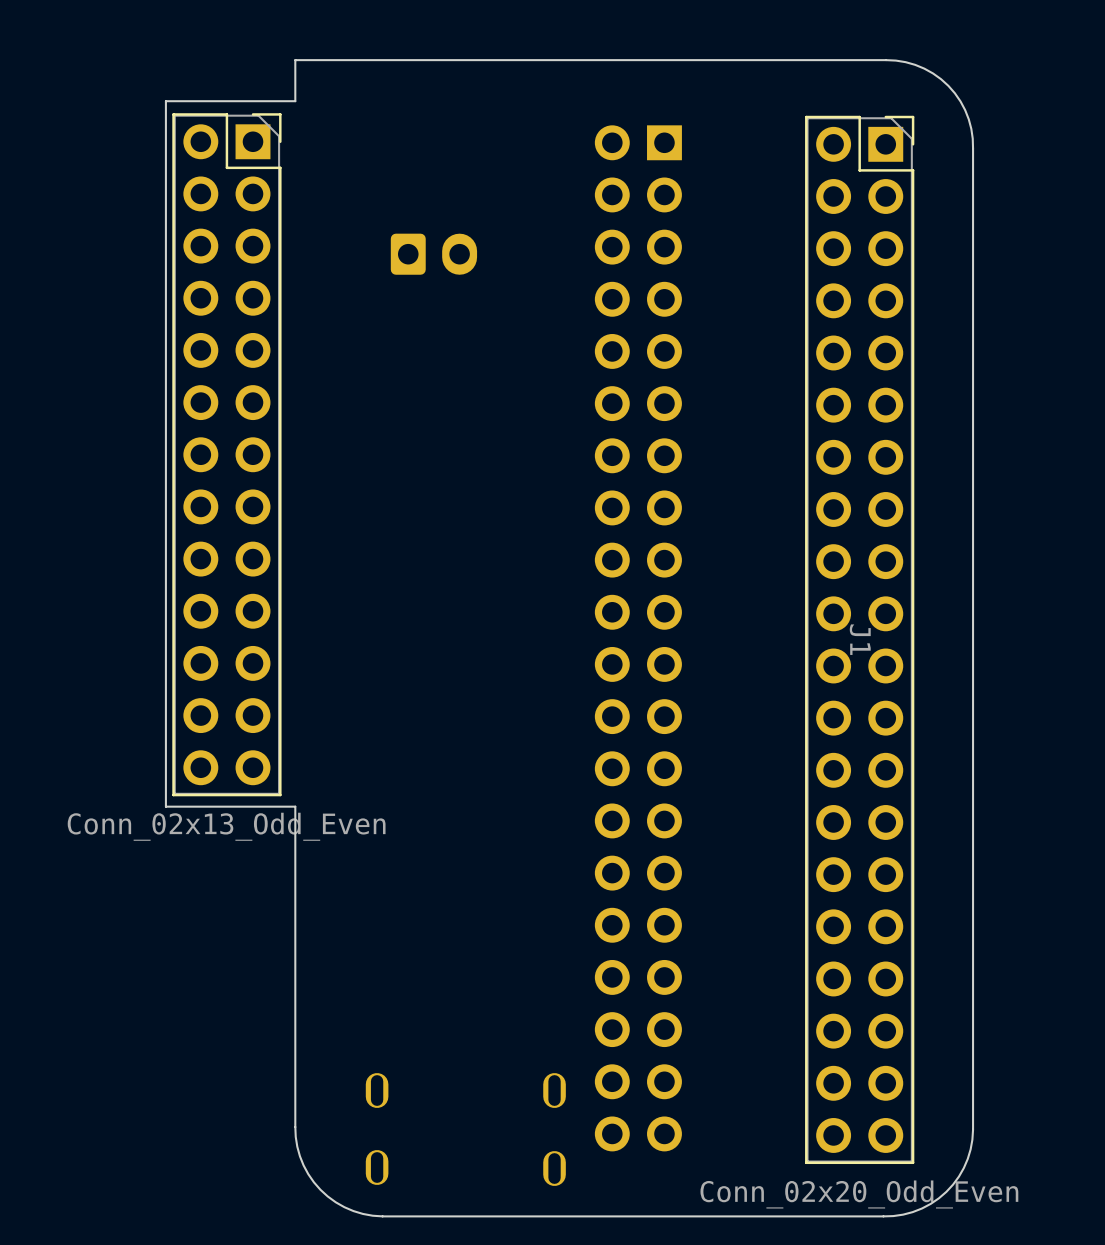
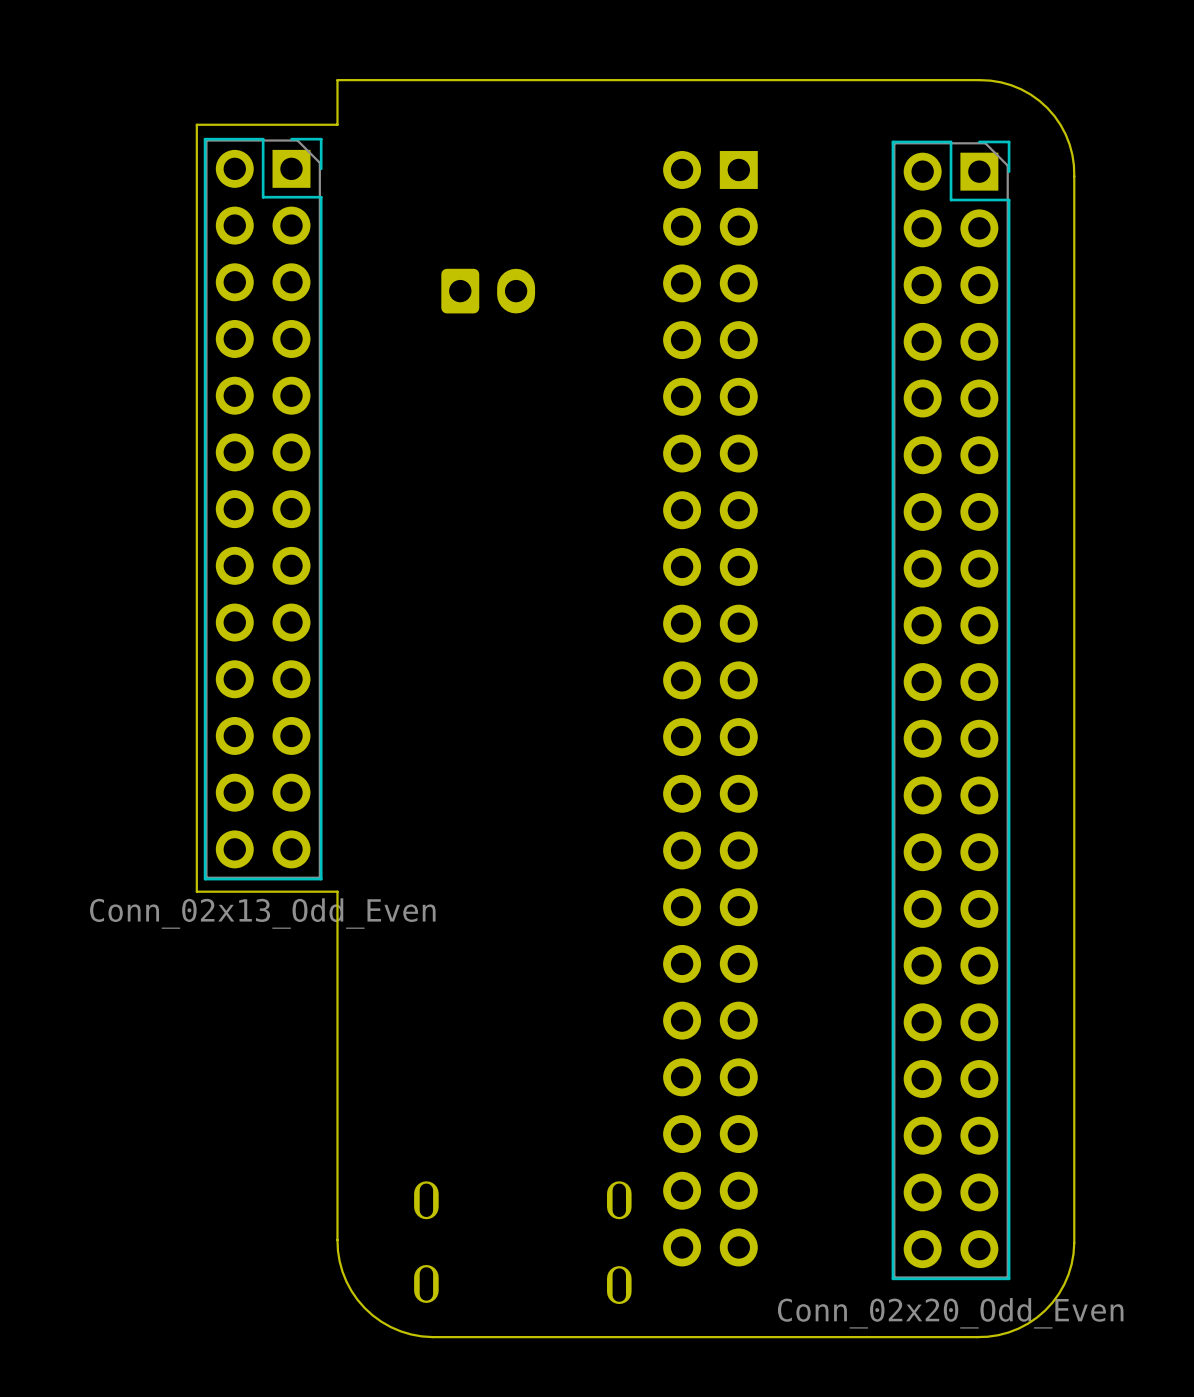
J1 name: J1 (860, 639) -> none

